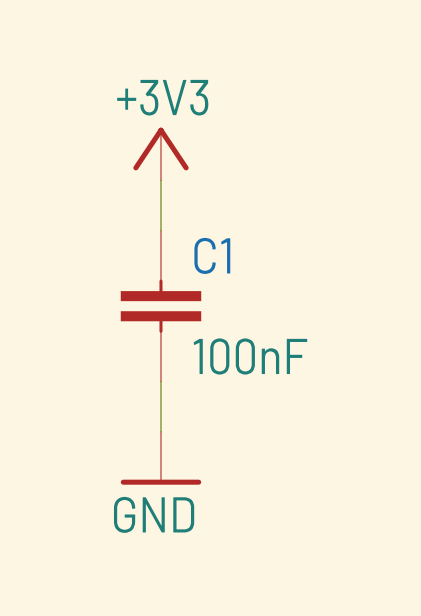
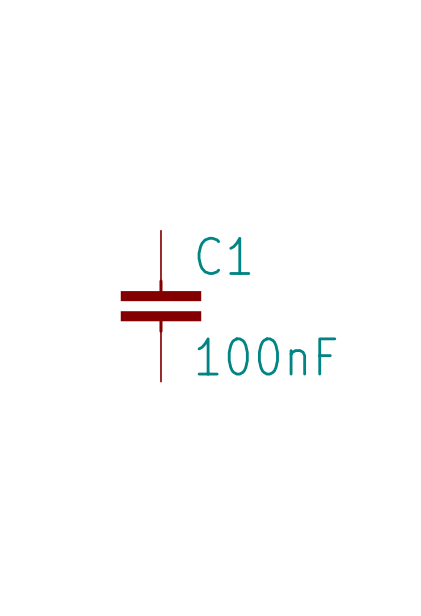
power symbol: +3V3 (160, 154) -> none
wire: (160, 180) (160, 230) -> none
wire: (160, 381) (160, 431) -> none
power symbol: GND (160, 458) -> none

